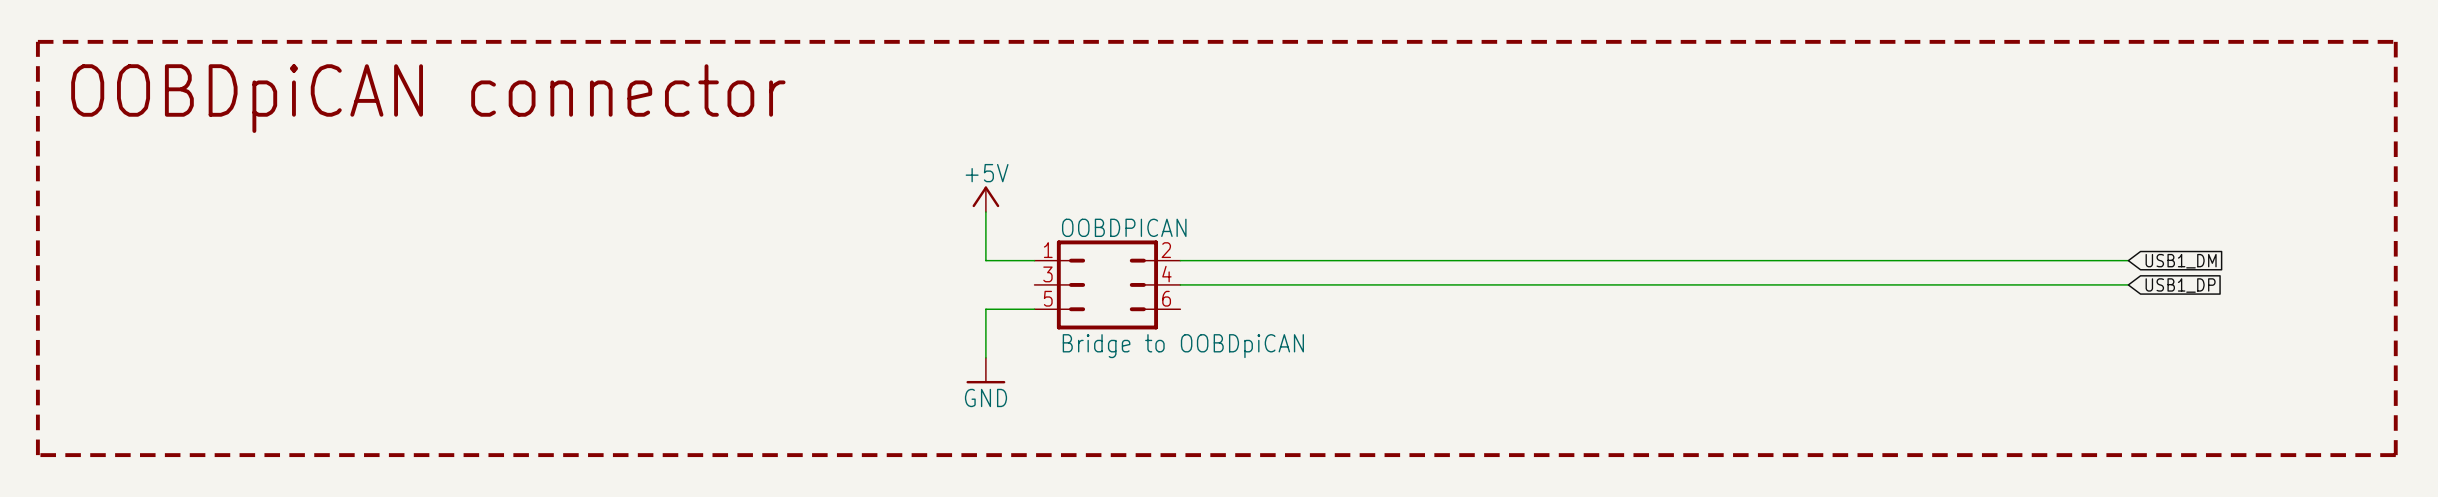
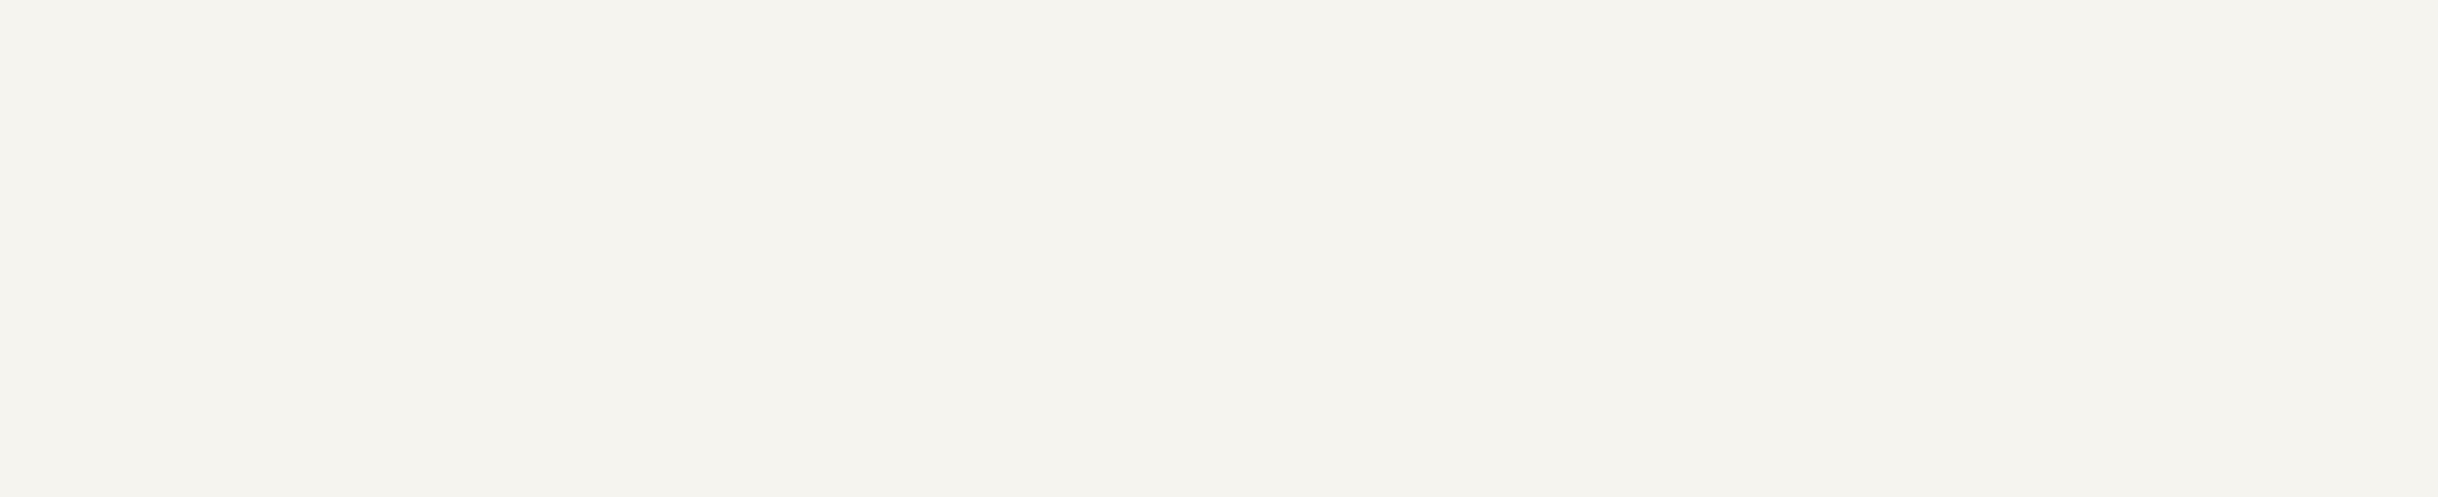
line: (37, 41) (2395, 41) (2395, 455) (37, 455) (37, 41) -> none
text: OOBDpiCAN connector (428, 98) -> none
power symbol: +5V (985, 199) -> none
wire: (985, 212) (985, 260) (1034, 260) -> none
wire: (1180, 260) (2128, 260) -> none
global label: USB1_DM (2181, 261) -> none
OOBDPICAN: Bridge to OOBDpiCAN (1107, 284) -> none
wire: (1180, 284) (2128, 284) -> none
global label: USB1_DP (2180, 285) -> none
wire: (1034, 309) (985, 309) (985, 357) -> none
power symbol: GND (985, 370) -> none

